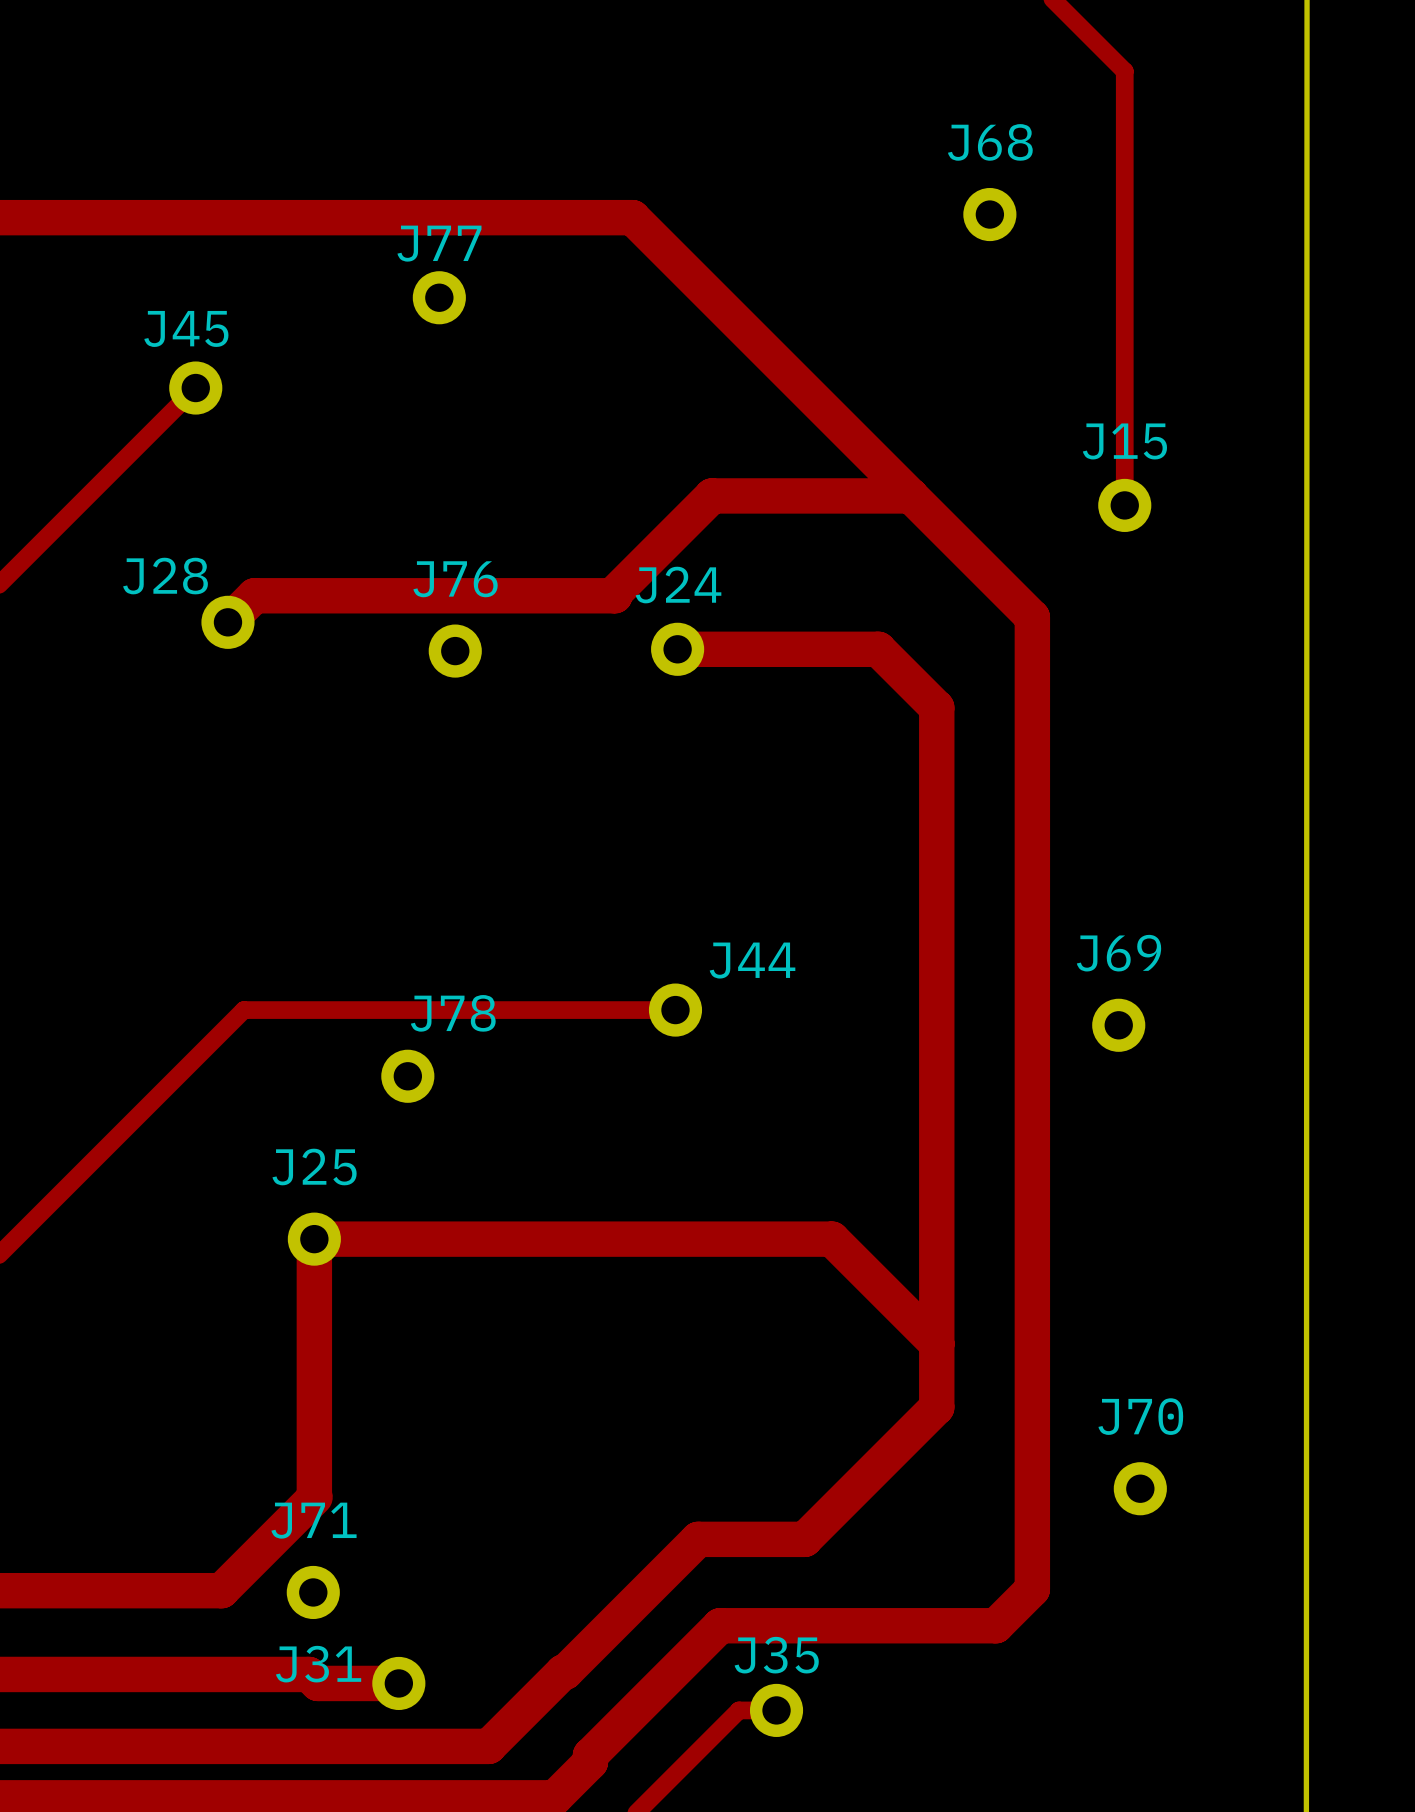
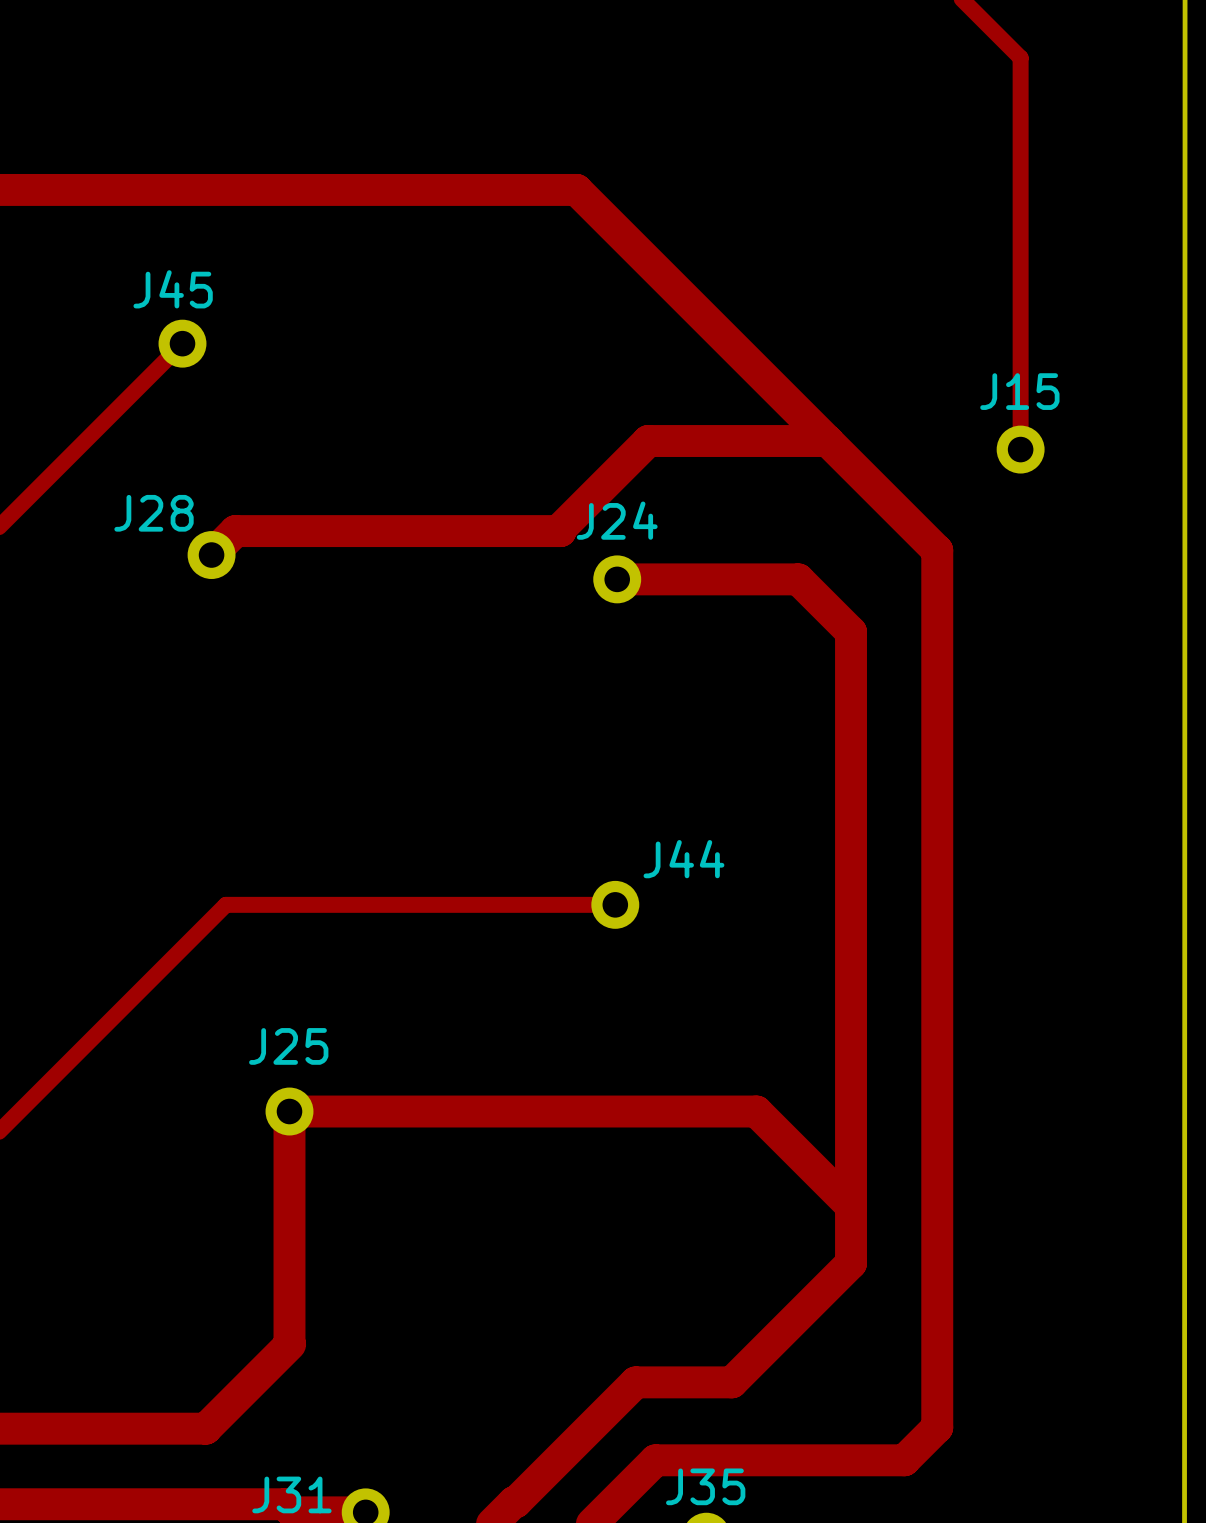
J68: (989, 214) -> none
J77: (439, 297) -> none
J76: (455, 651) -> none
J69: (1118, 1025) -> none
J78: (407, 1076) -> none
J70: (1140, 1488) -> none
J71: (313, 1592) -> none

